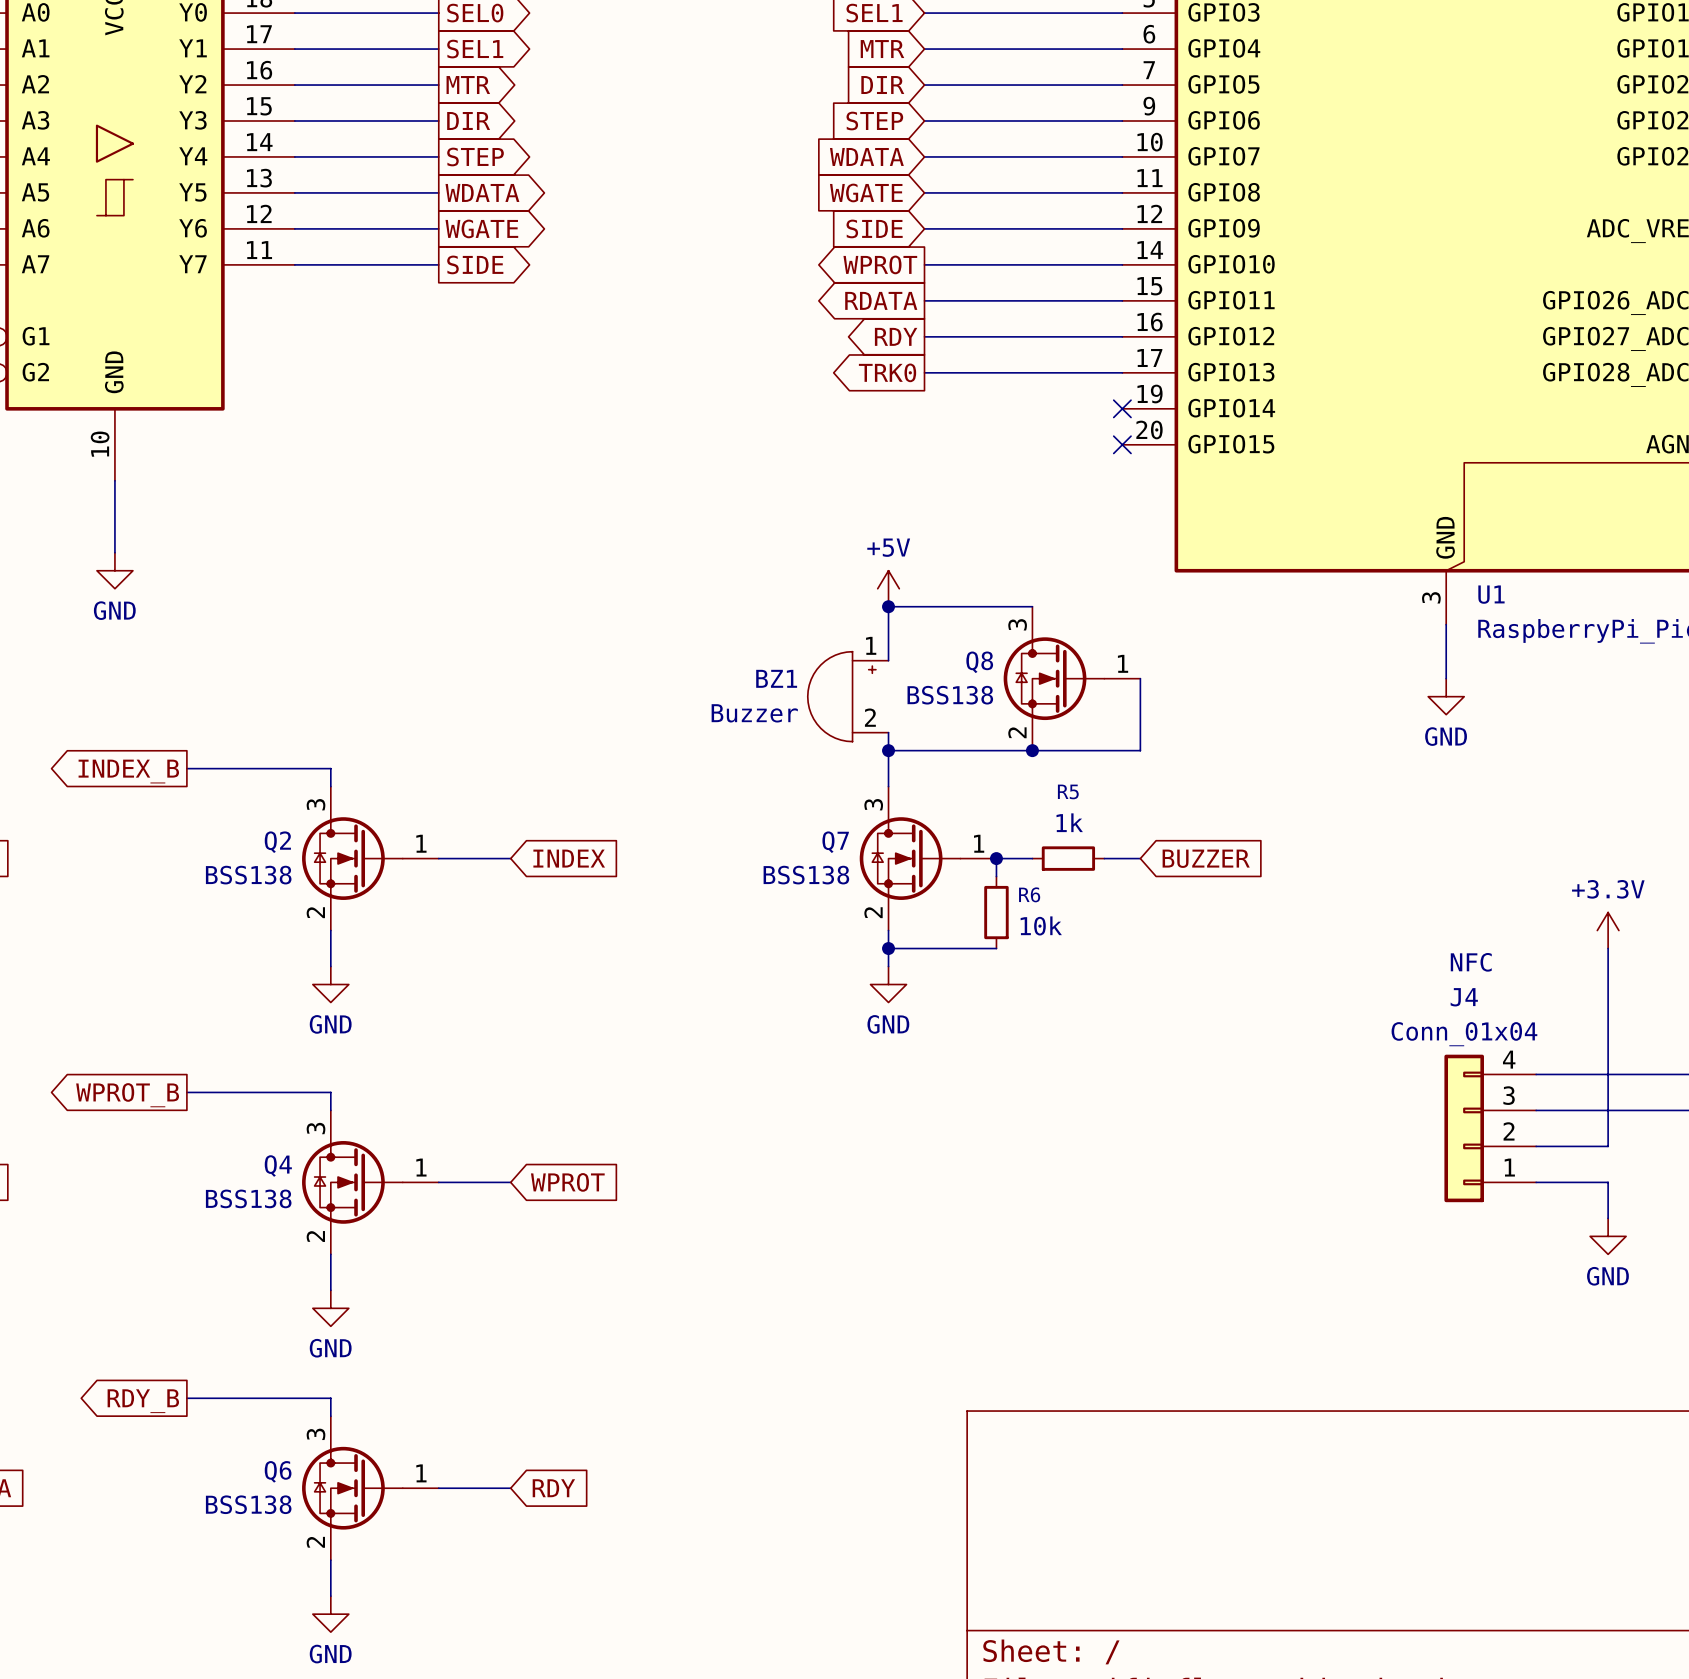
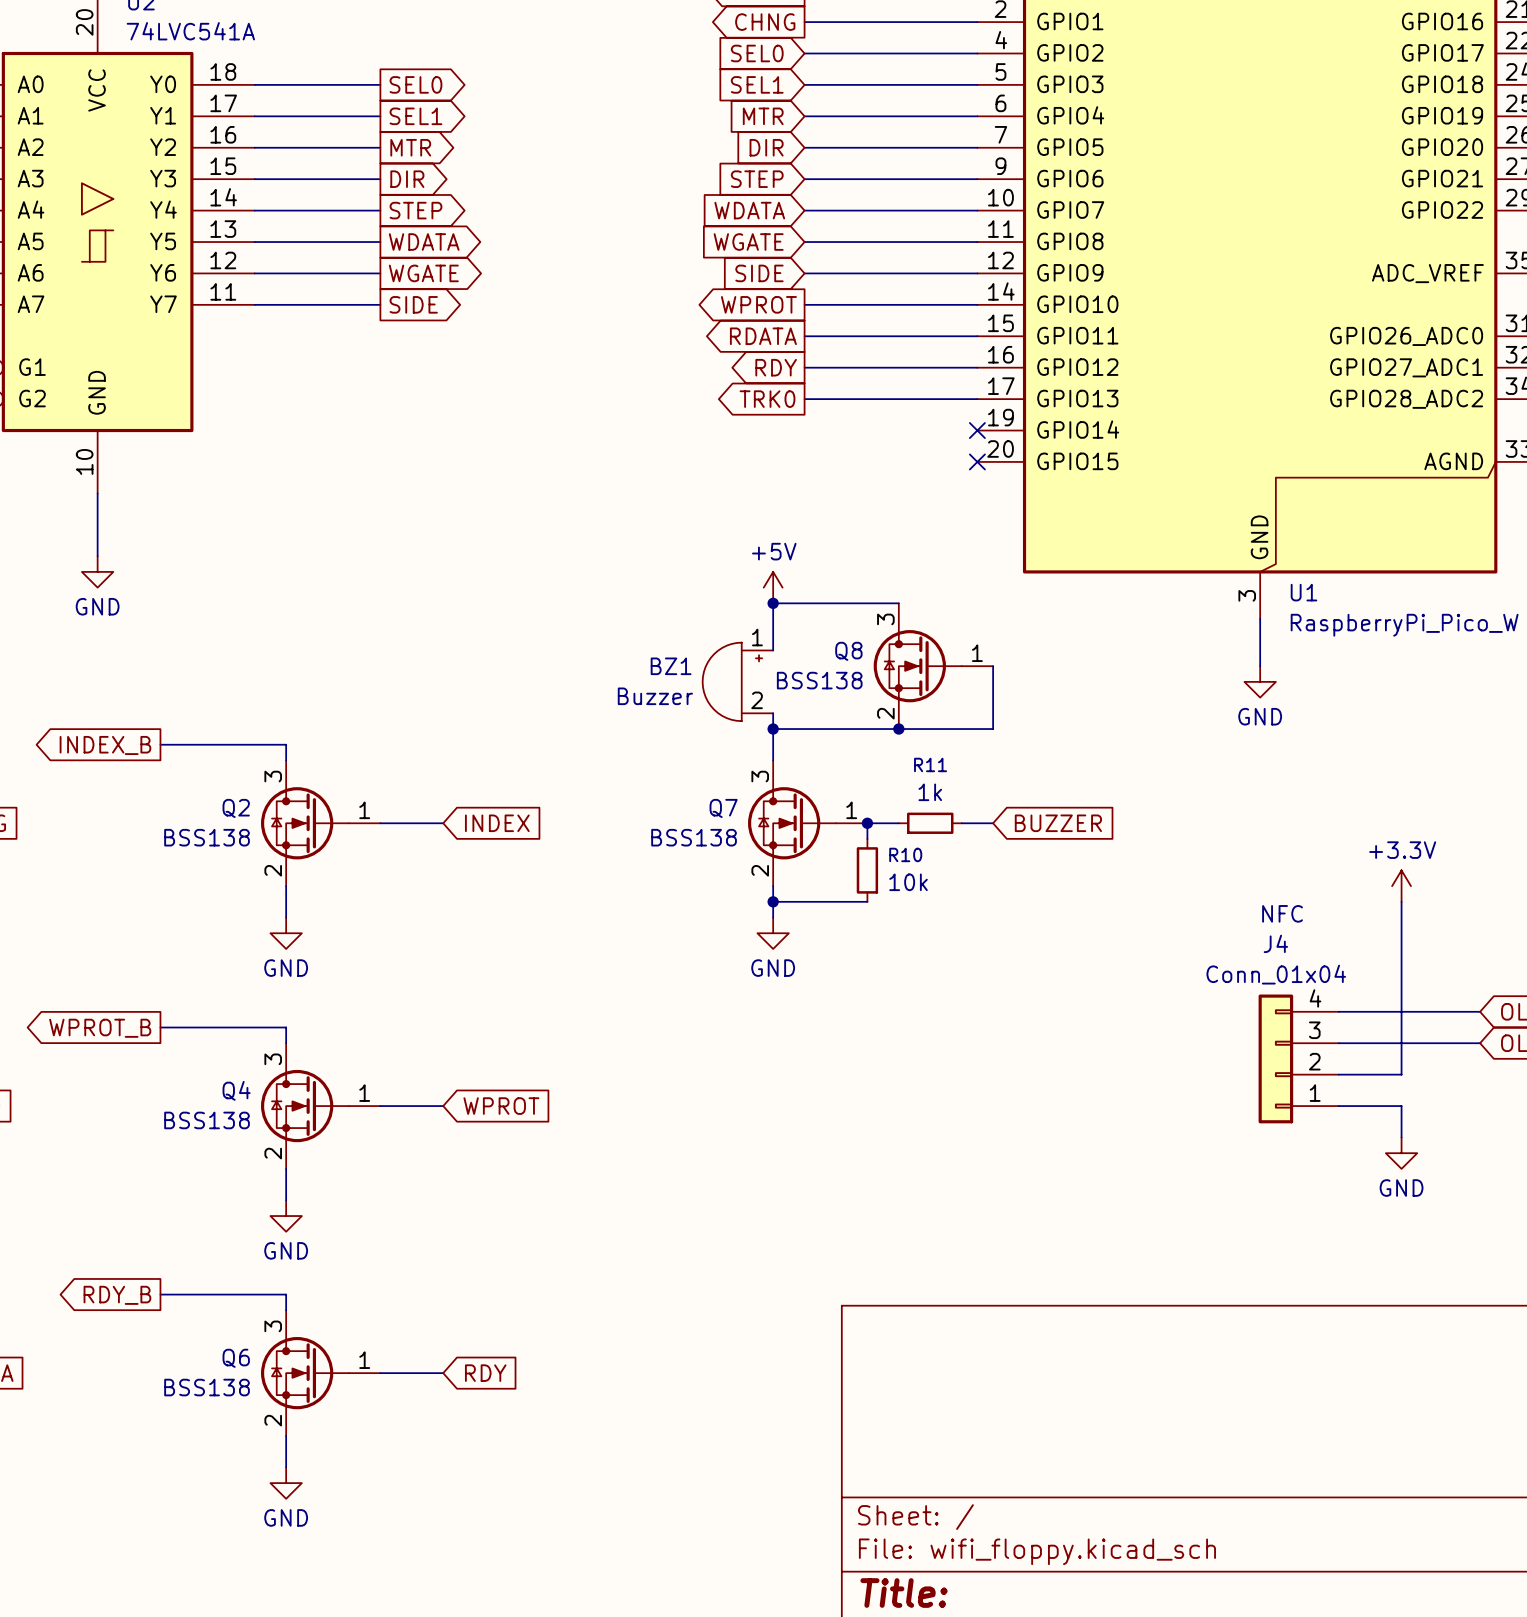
R5 name: R5 (1068, 791) -> R11 (930, 764)
R6 name: R6 (1029, 894) -> R10 (905, 854)

